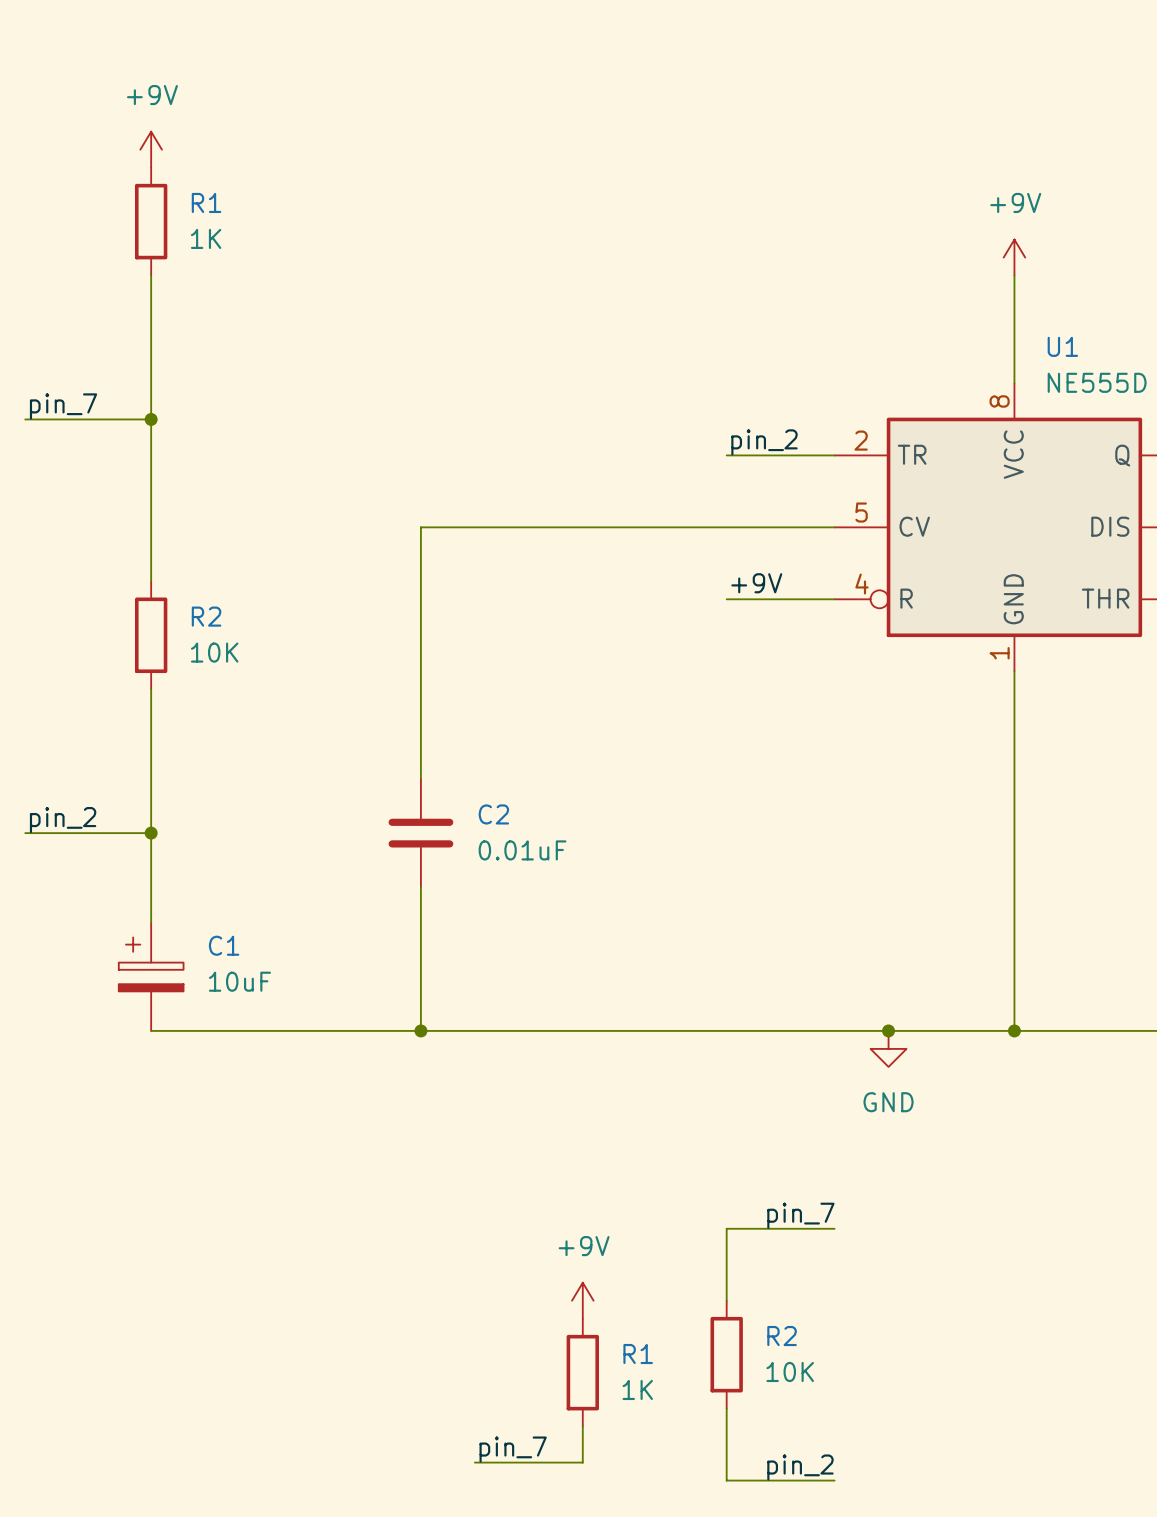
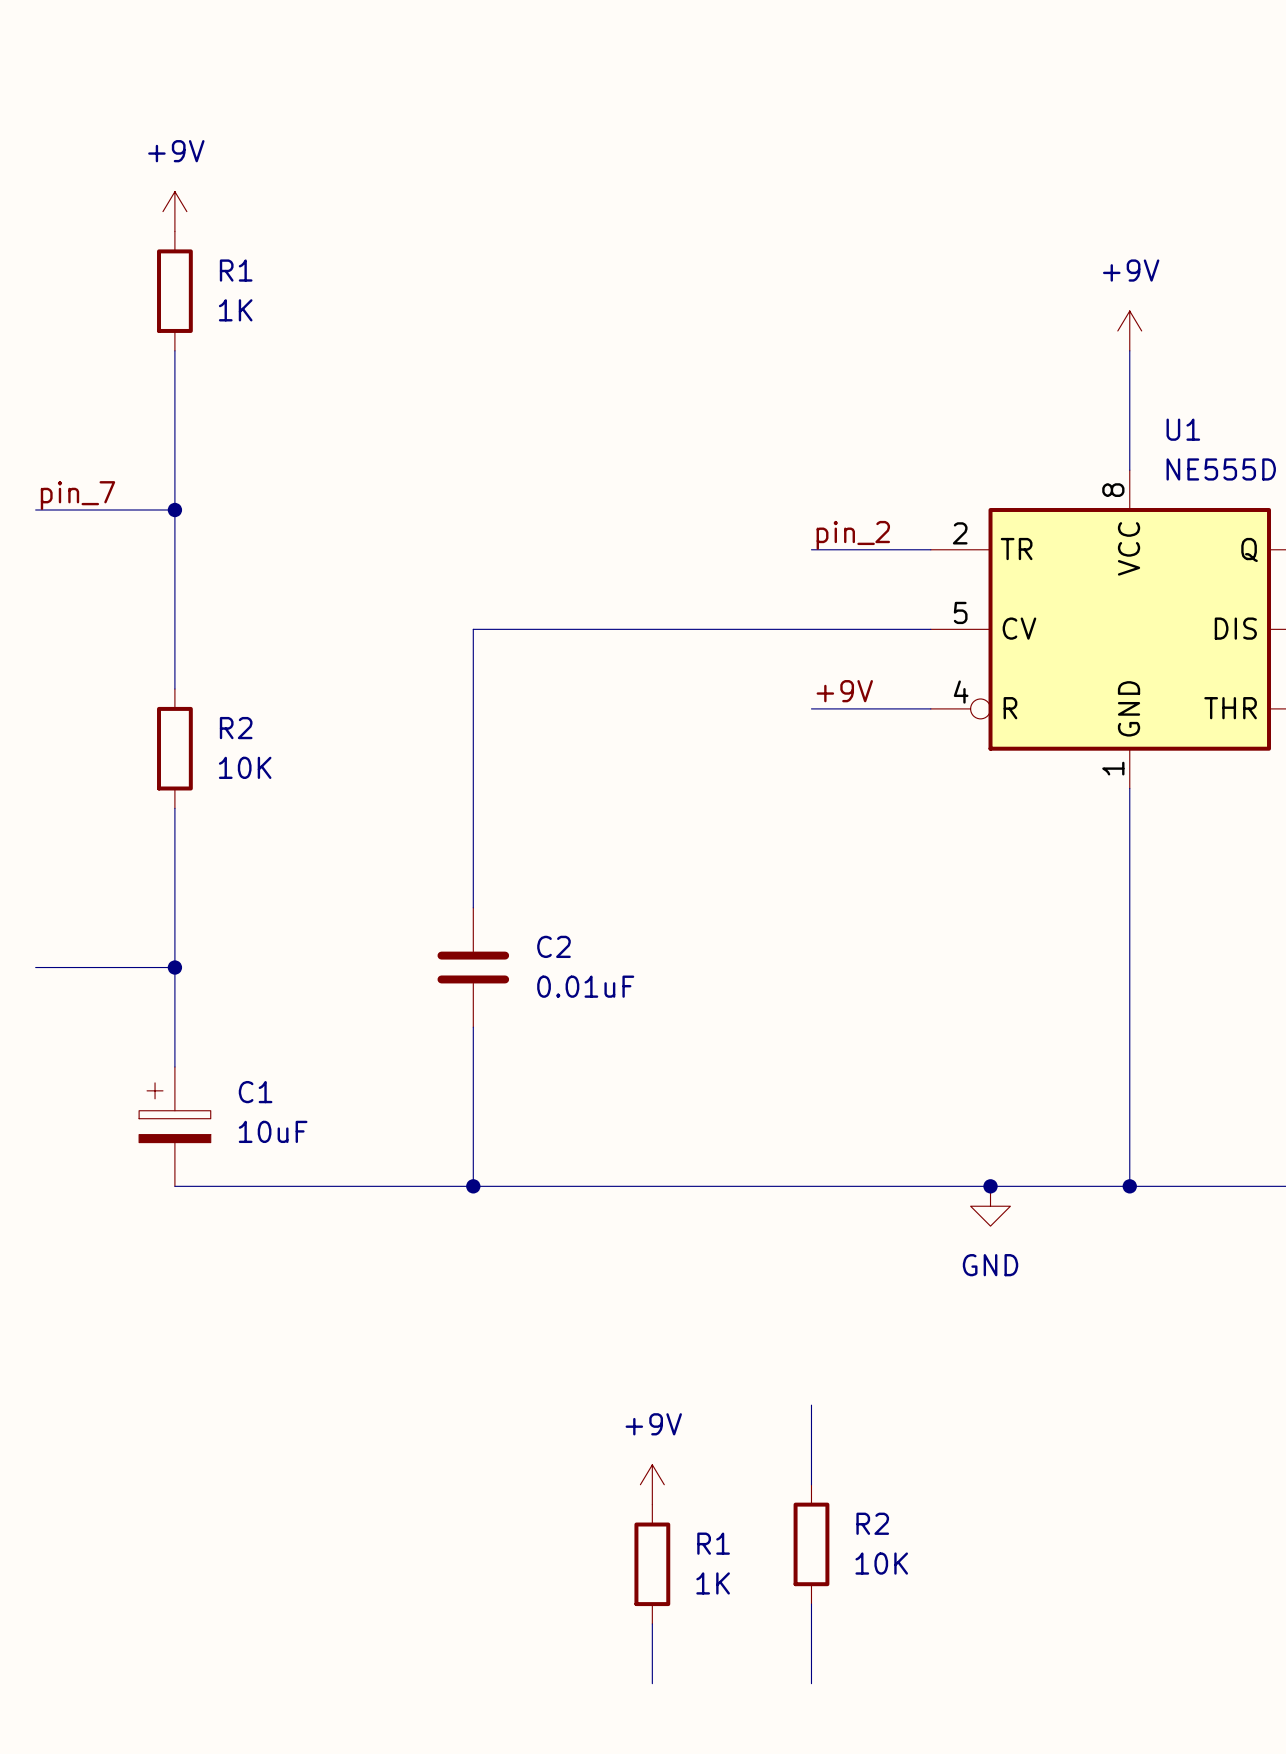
label: pin_2 (63, 820) -> none
label: pin_7 (800, 1215) -> none
wire: (726, 1228) (834, 1228) -> none
label: pin_7 (513, 1449) -> none
wire: (474, 1462) (582, 1462) -> (652, 1683) (652, 1663)
label: pin_2 (800, 1467) -> none
wire: (726, 1480) (834, 1480) -> none

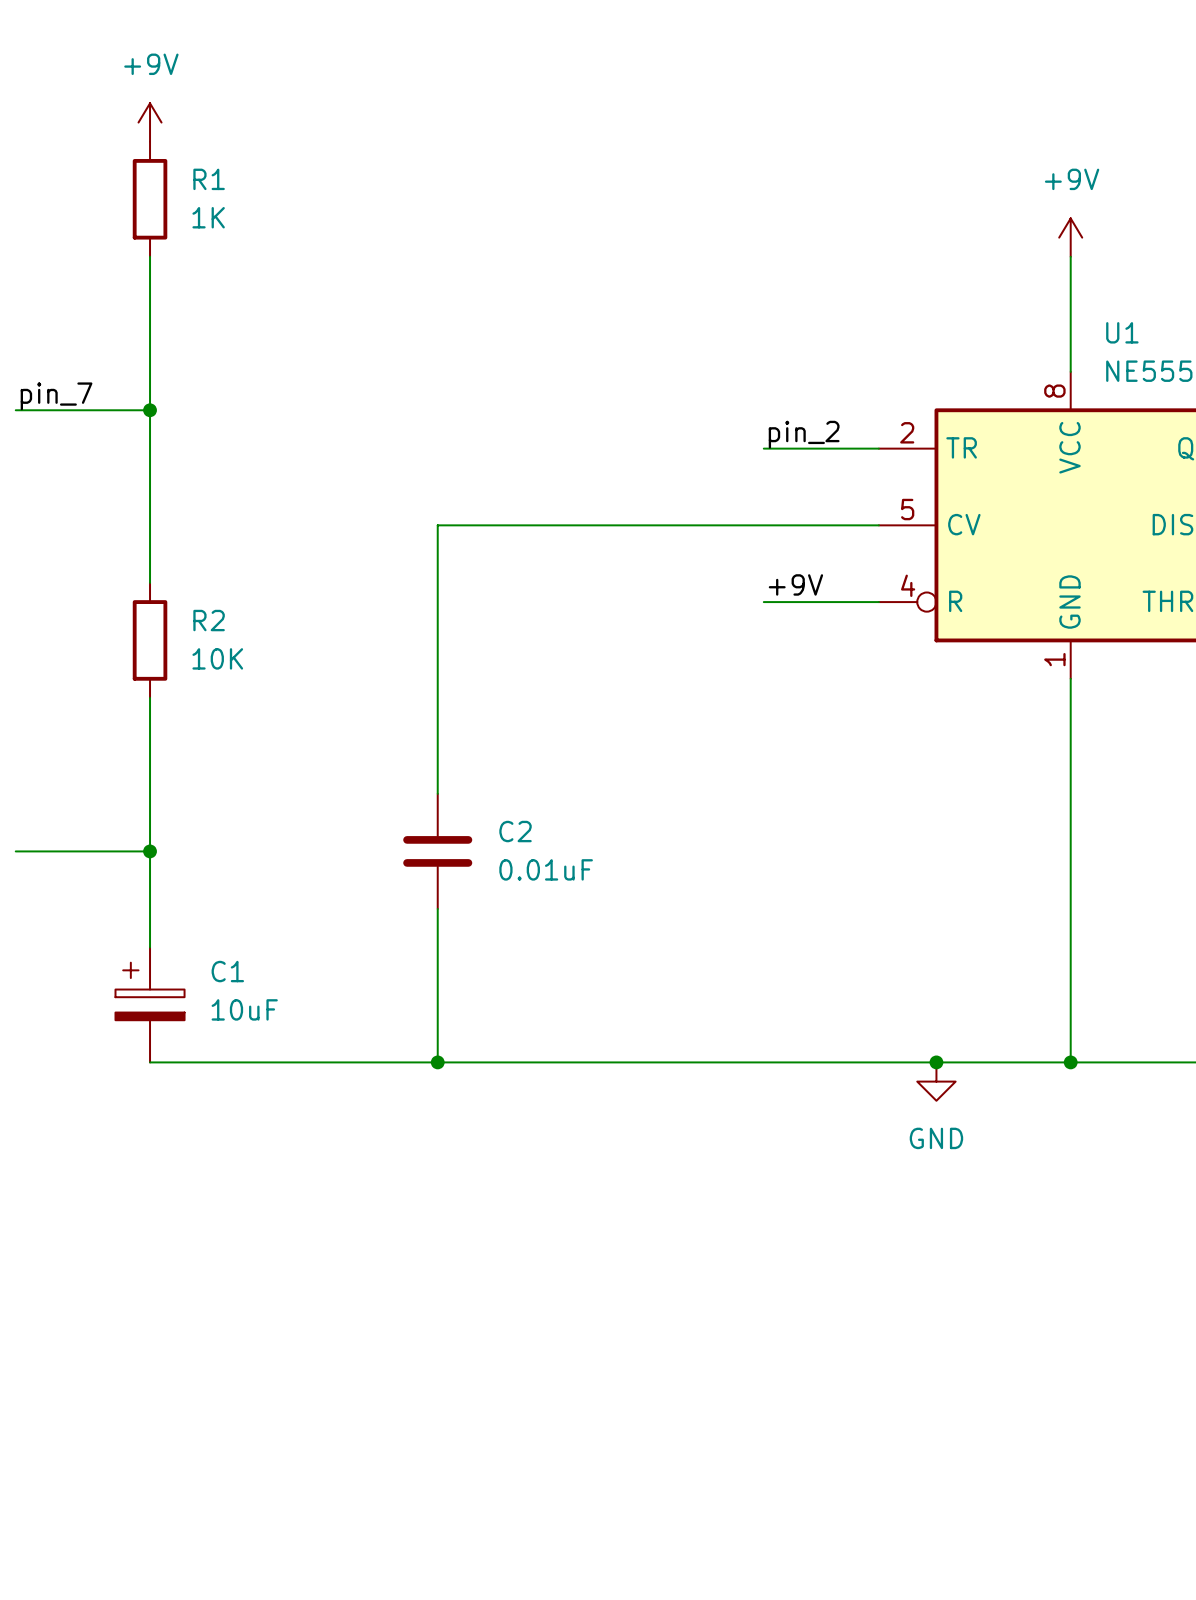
wire: (811, 1405) (811, 1484) -> none
power symbol: +9V (652, 1484) -> none
R2: 10K (811, 1544) -> none
R1: 1K (652, 1564) -> none
wire: (811, 1604) (811, 1683) -> none
wire: (652, 1623) (652, 1683) -> none

